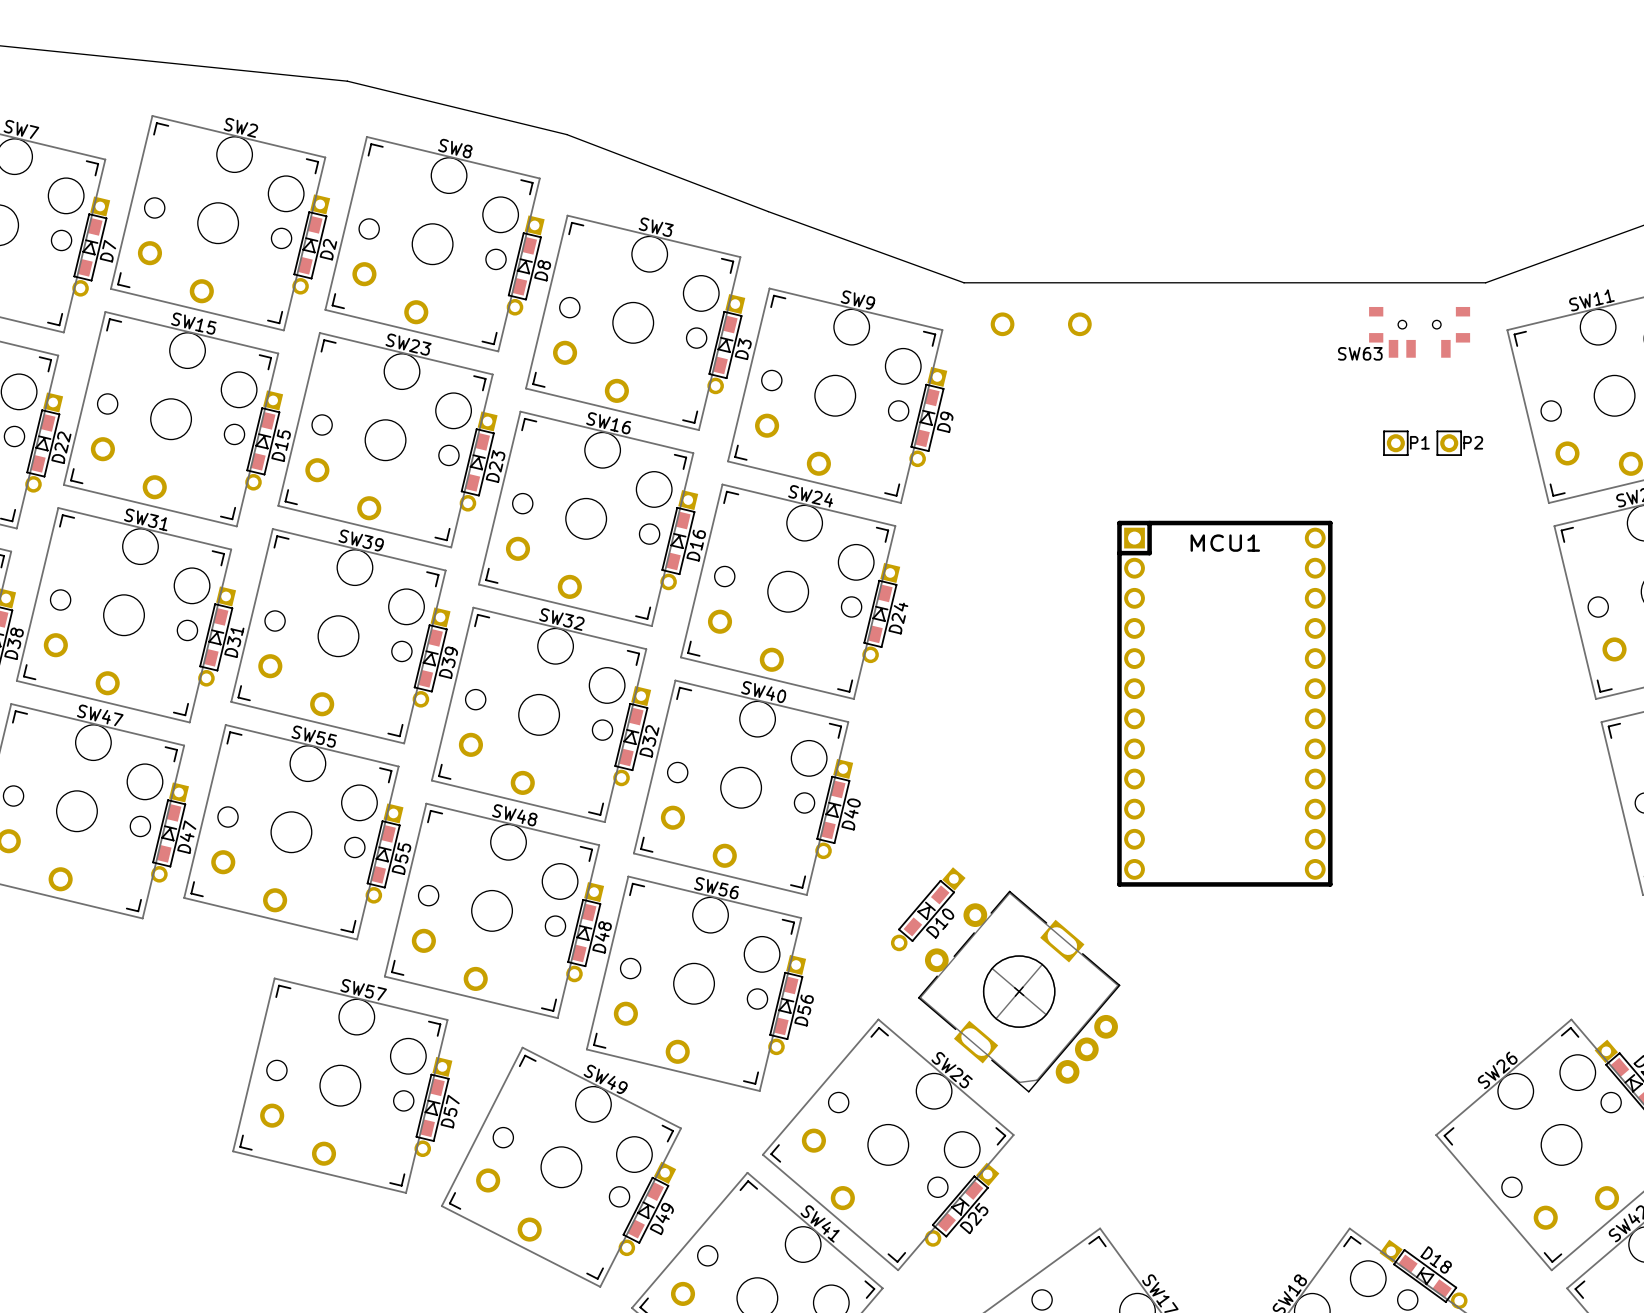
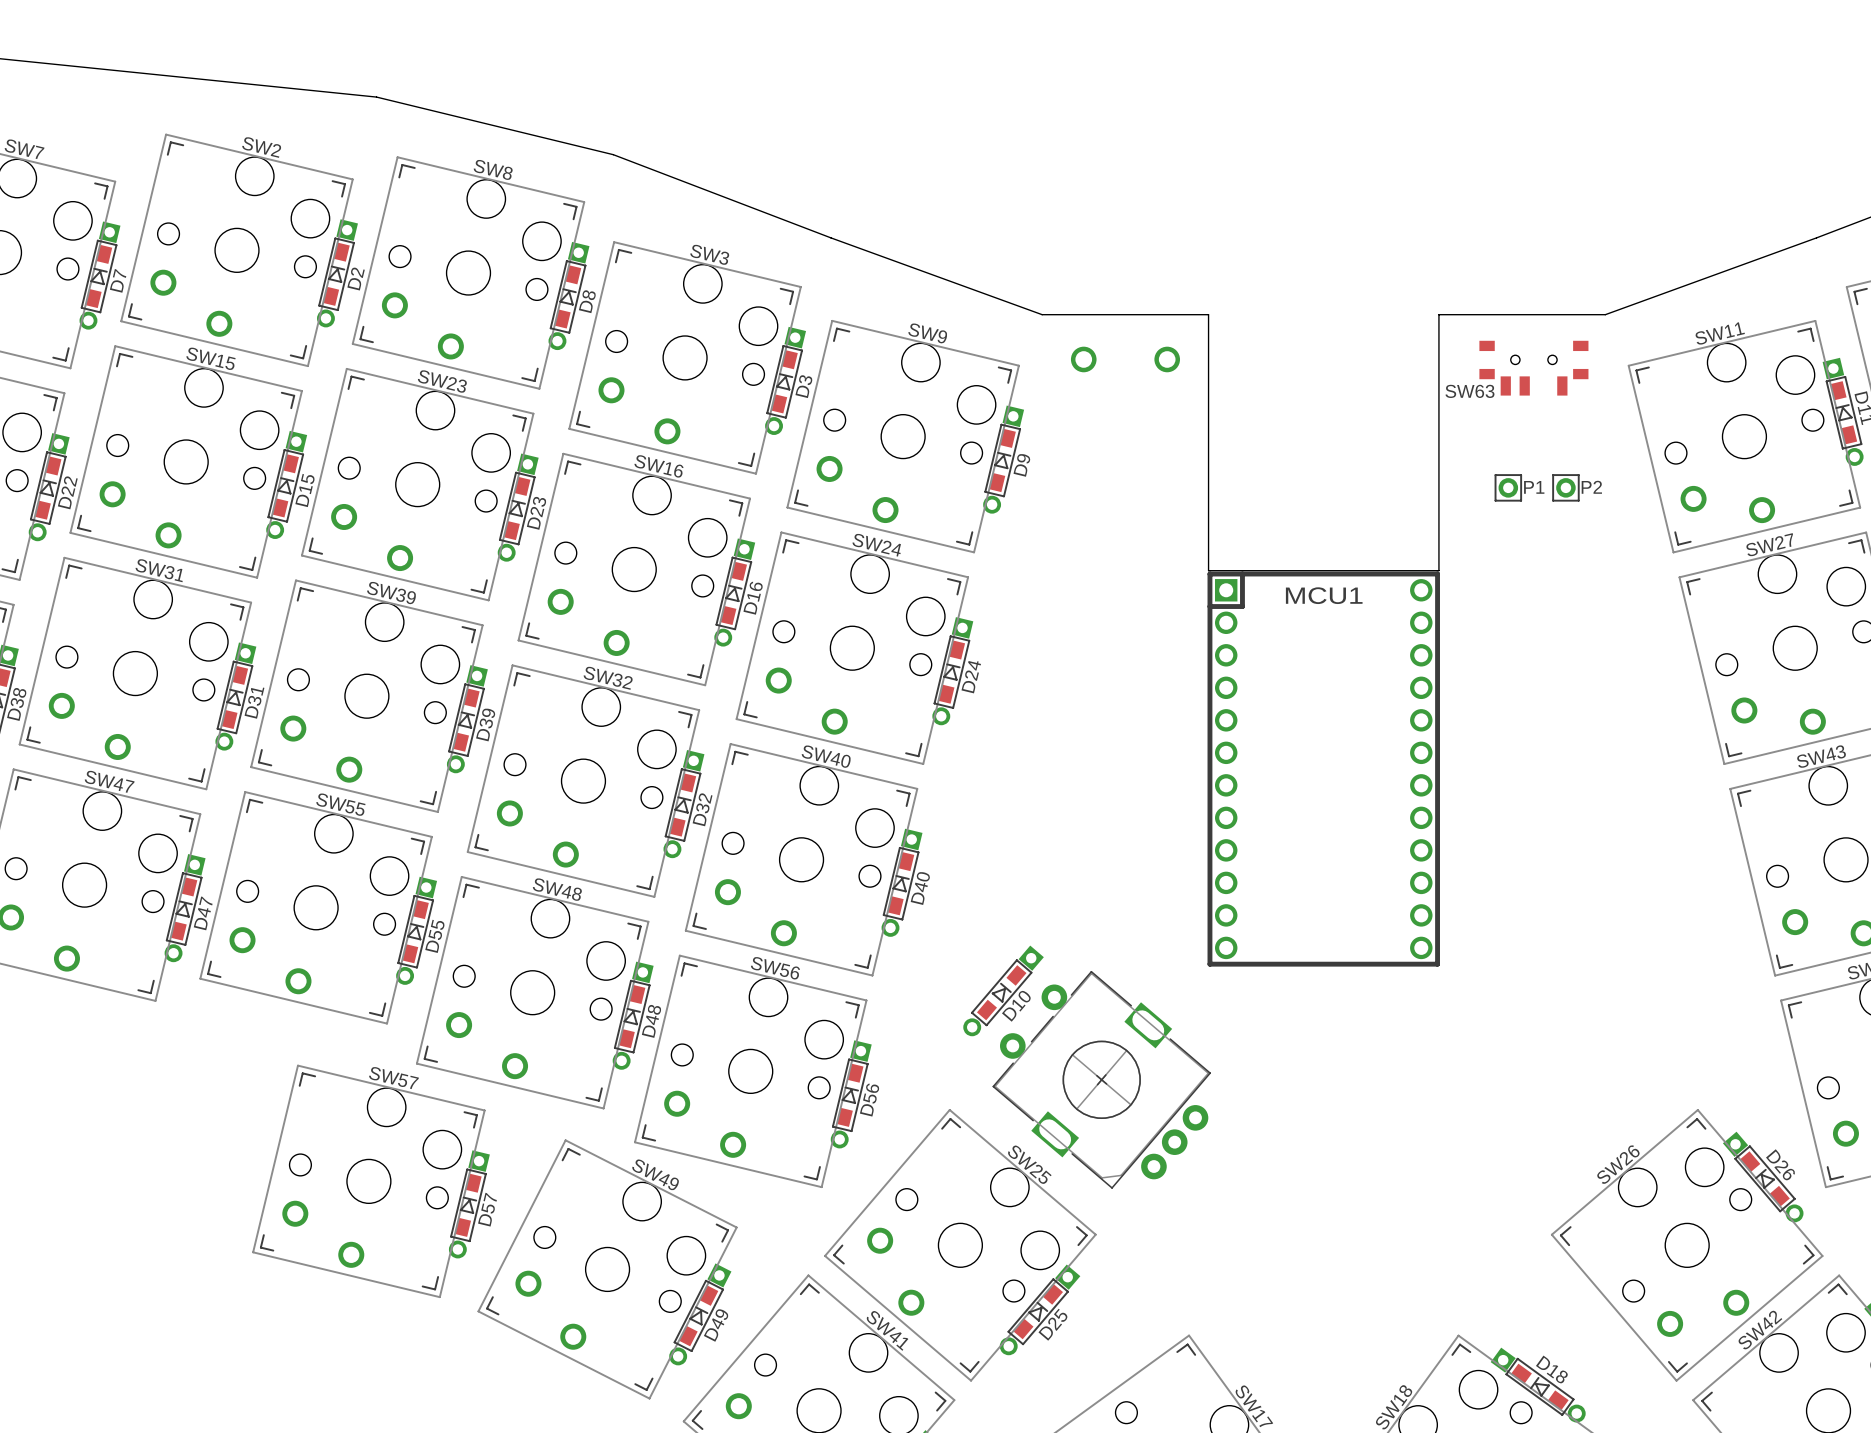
board edge: (1118, 282) (1331, 282) -> (1208, 314) (1208, 570) (1438, 570) (1438, 314)

